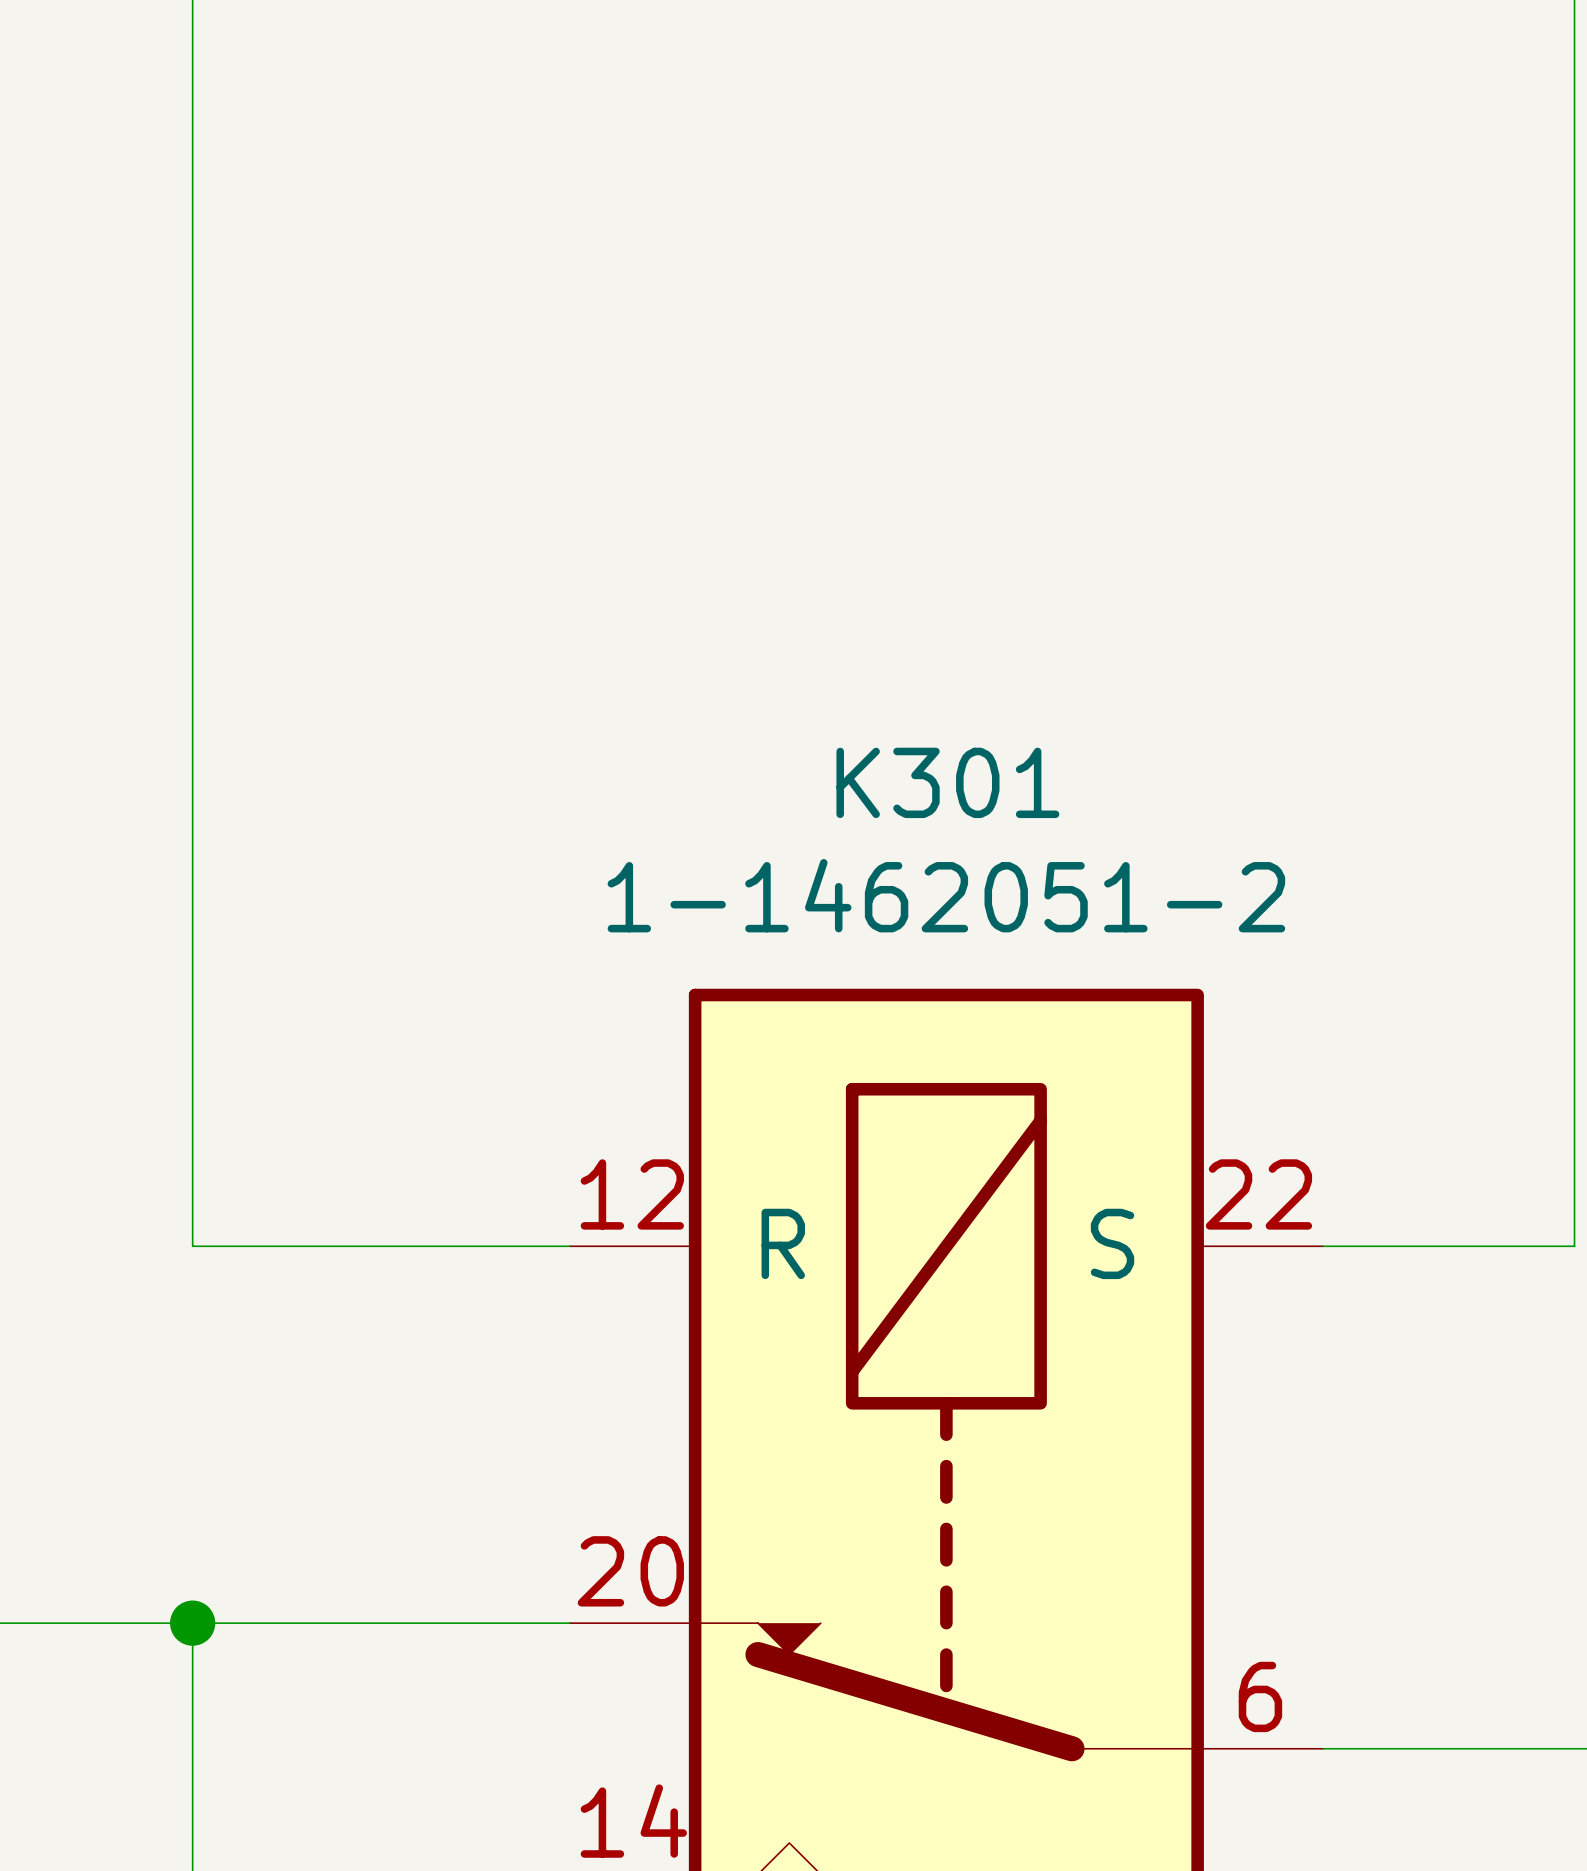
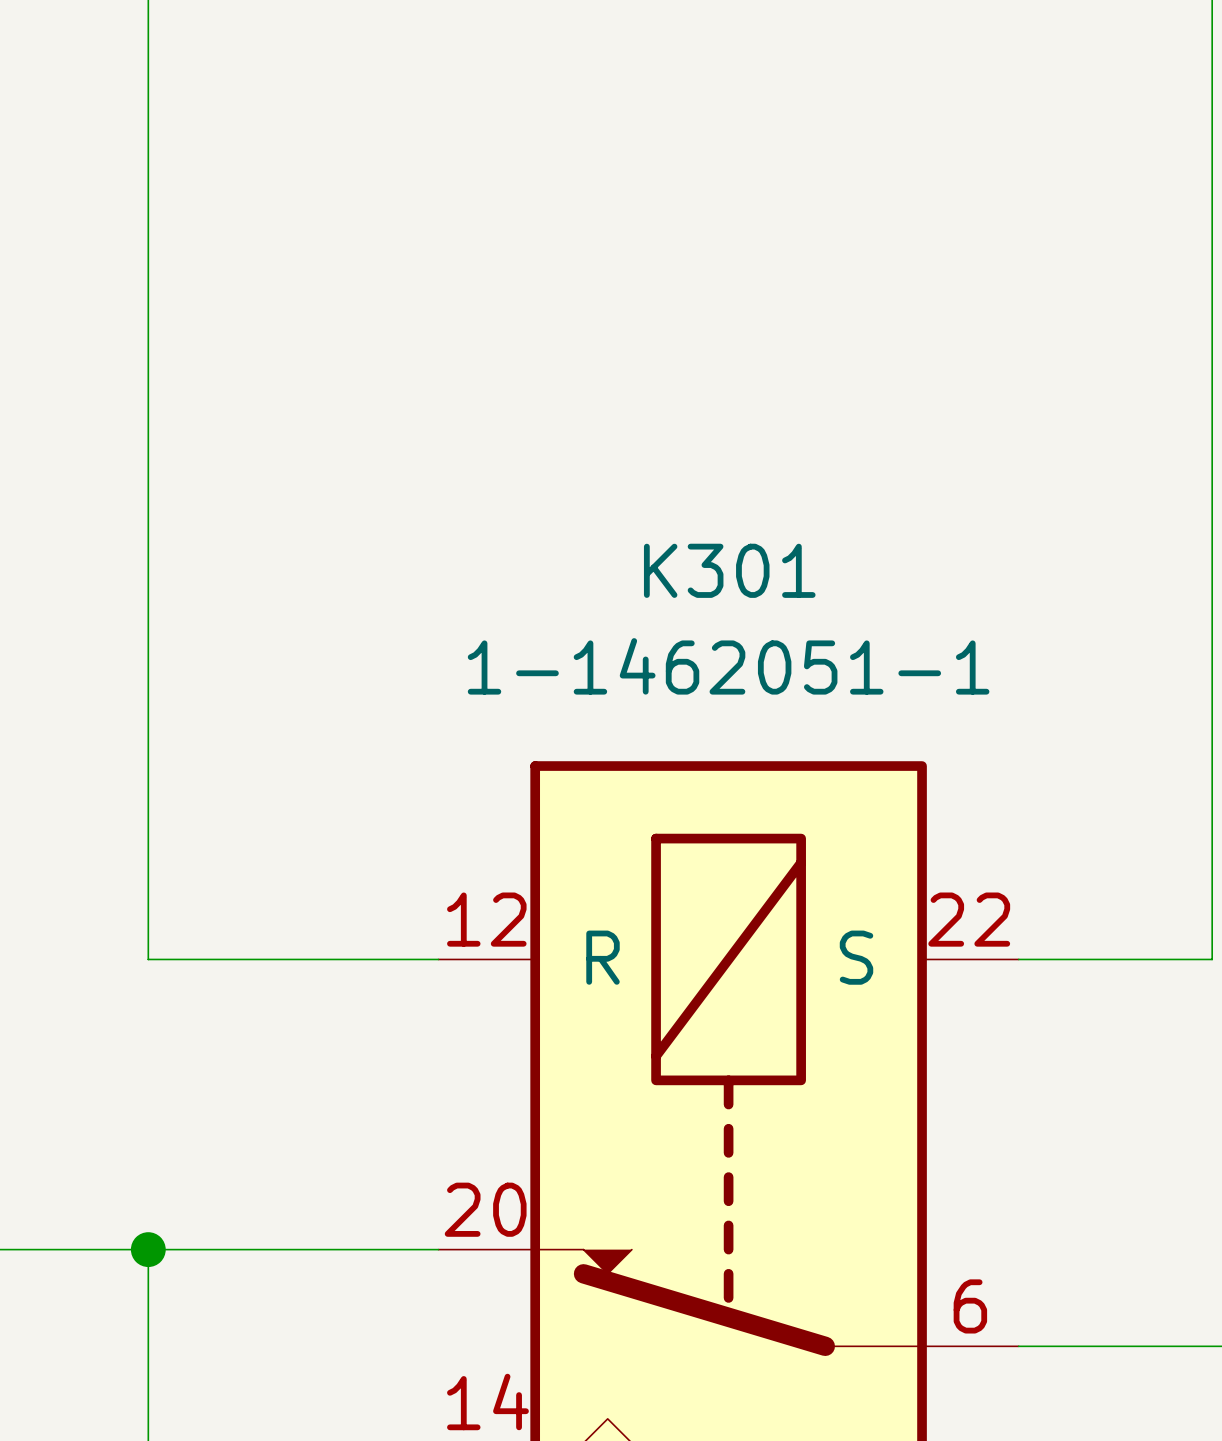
K301 name position: K301 (947, 782) -> K301 (729, 570)
K301 value: 1-1462051-2 (946, 895) -> 1-1462051-1 (728, 666)

